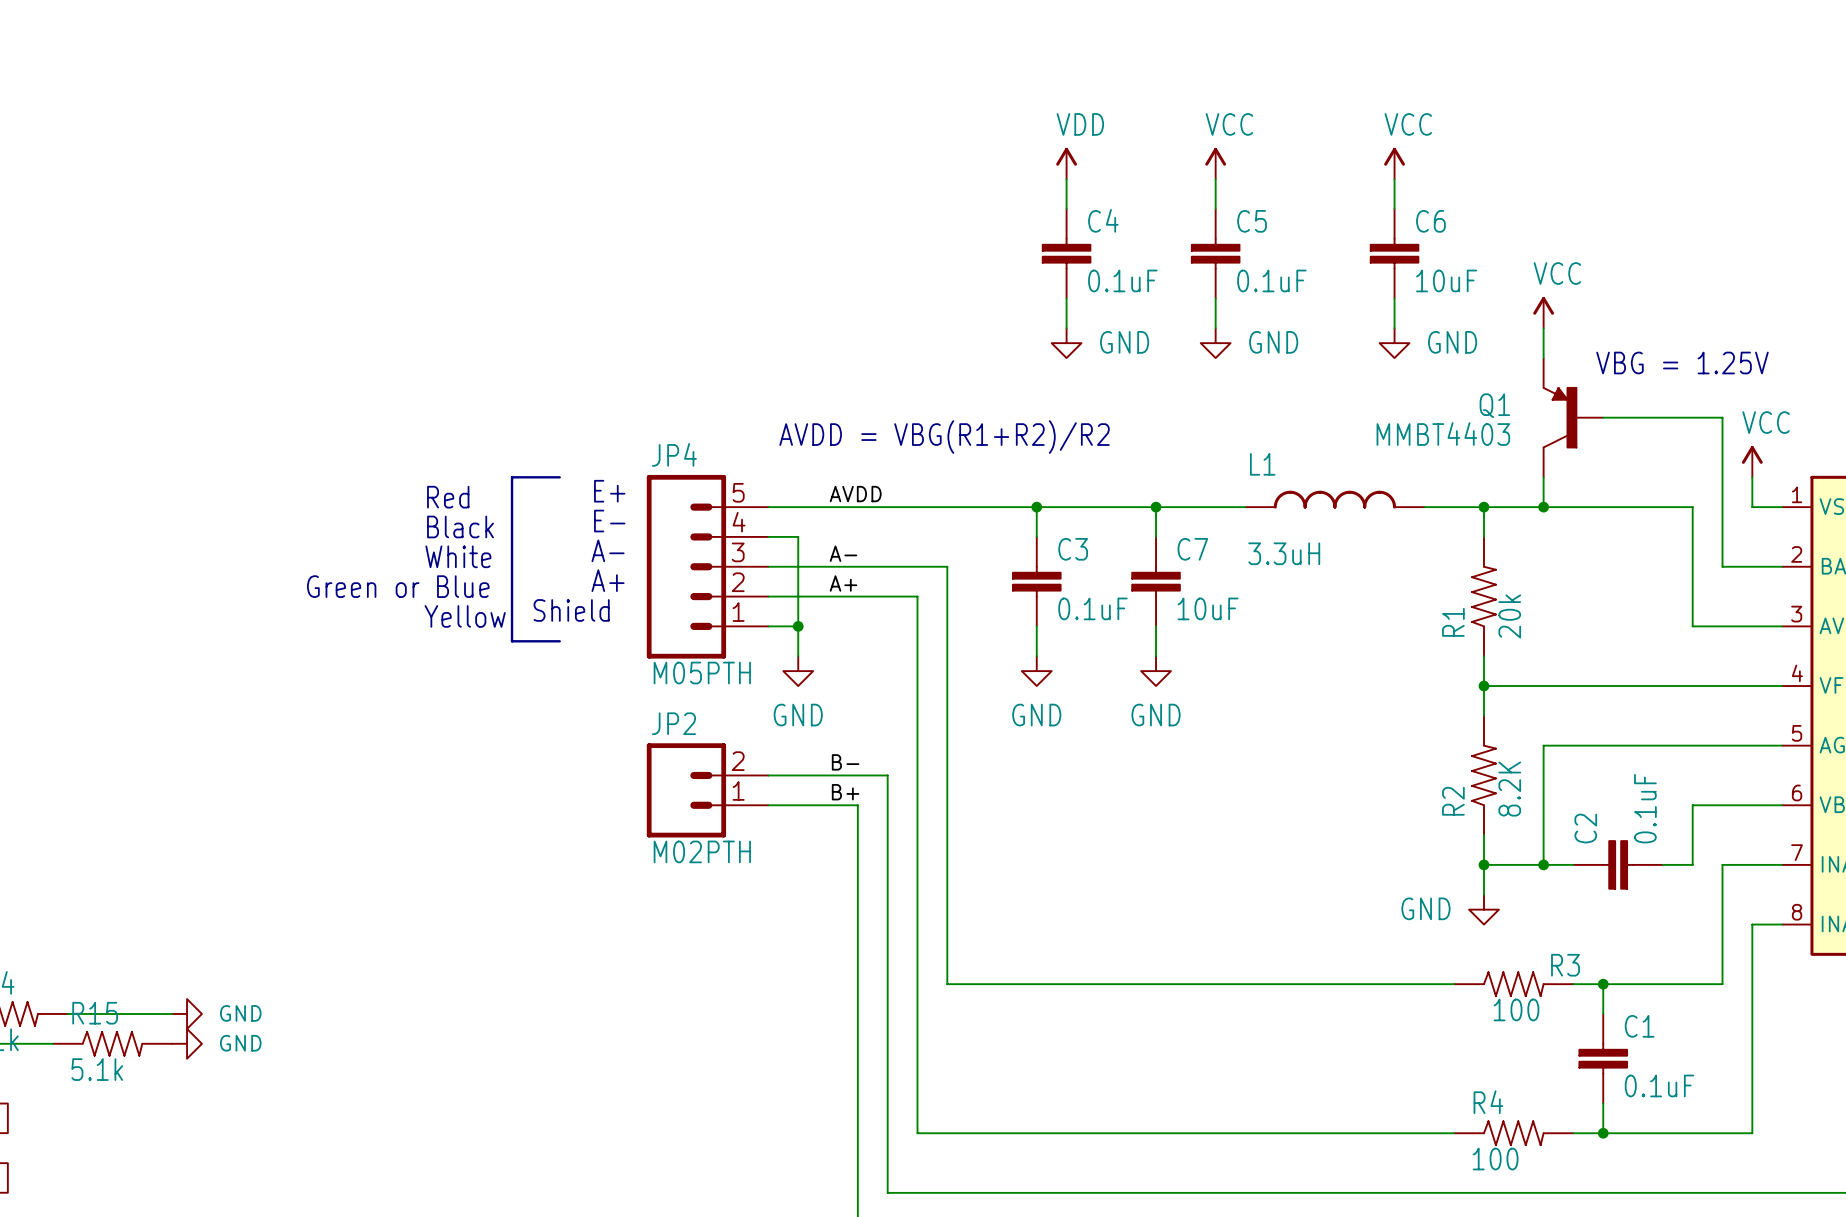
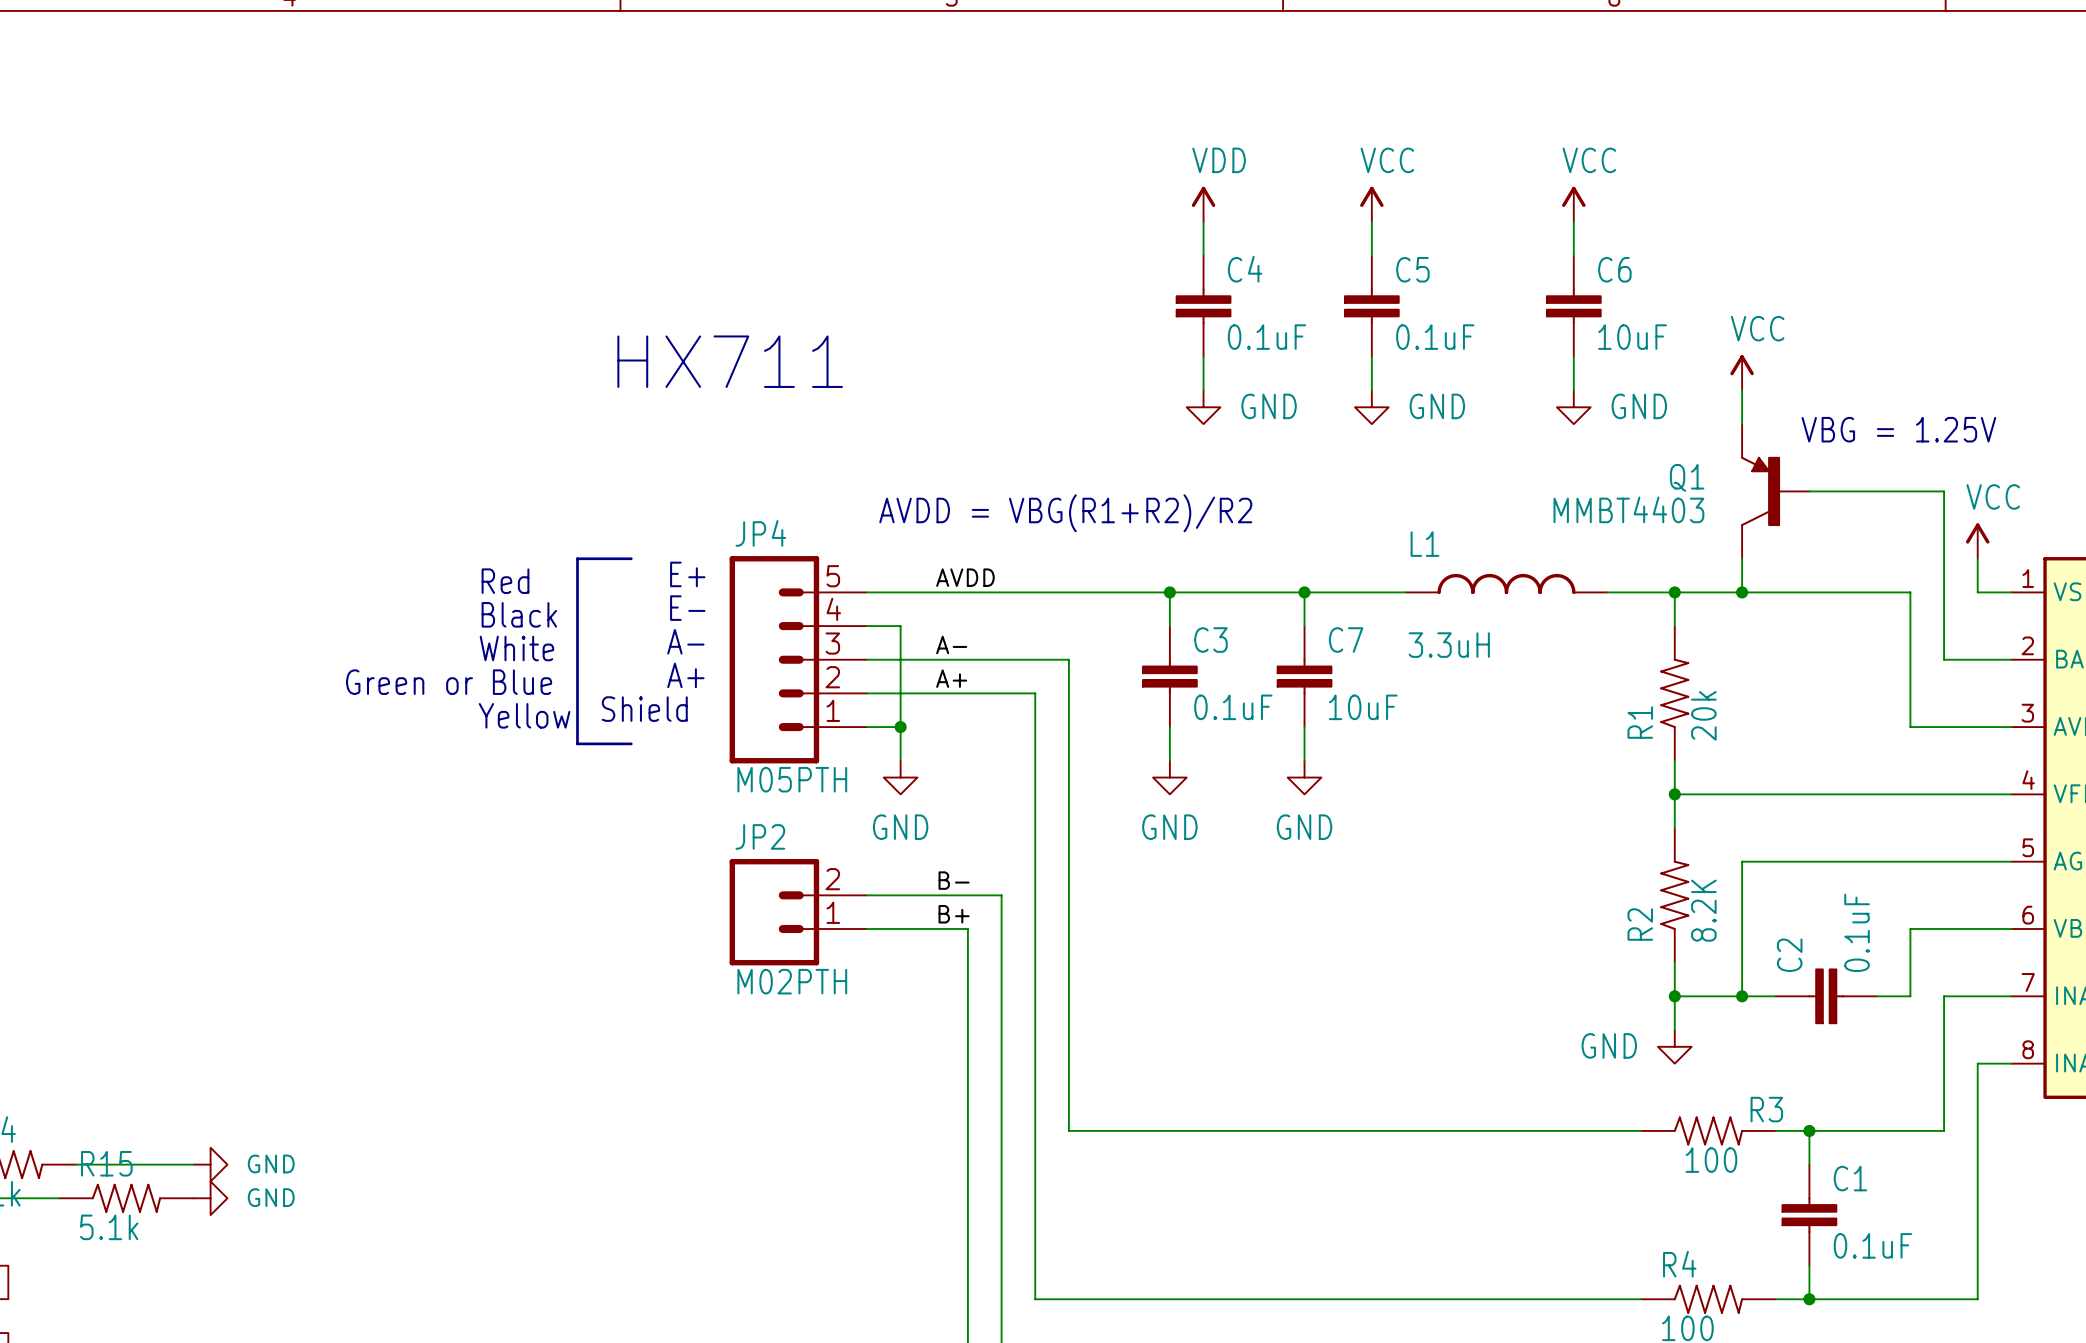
text: none -> HX711 (730, 361)

